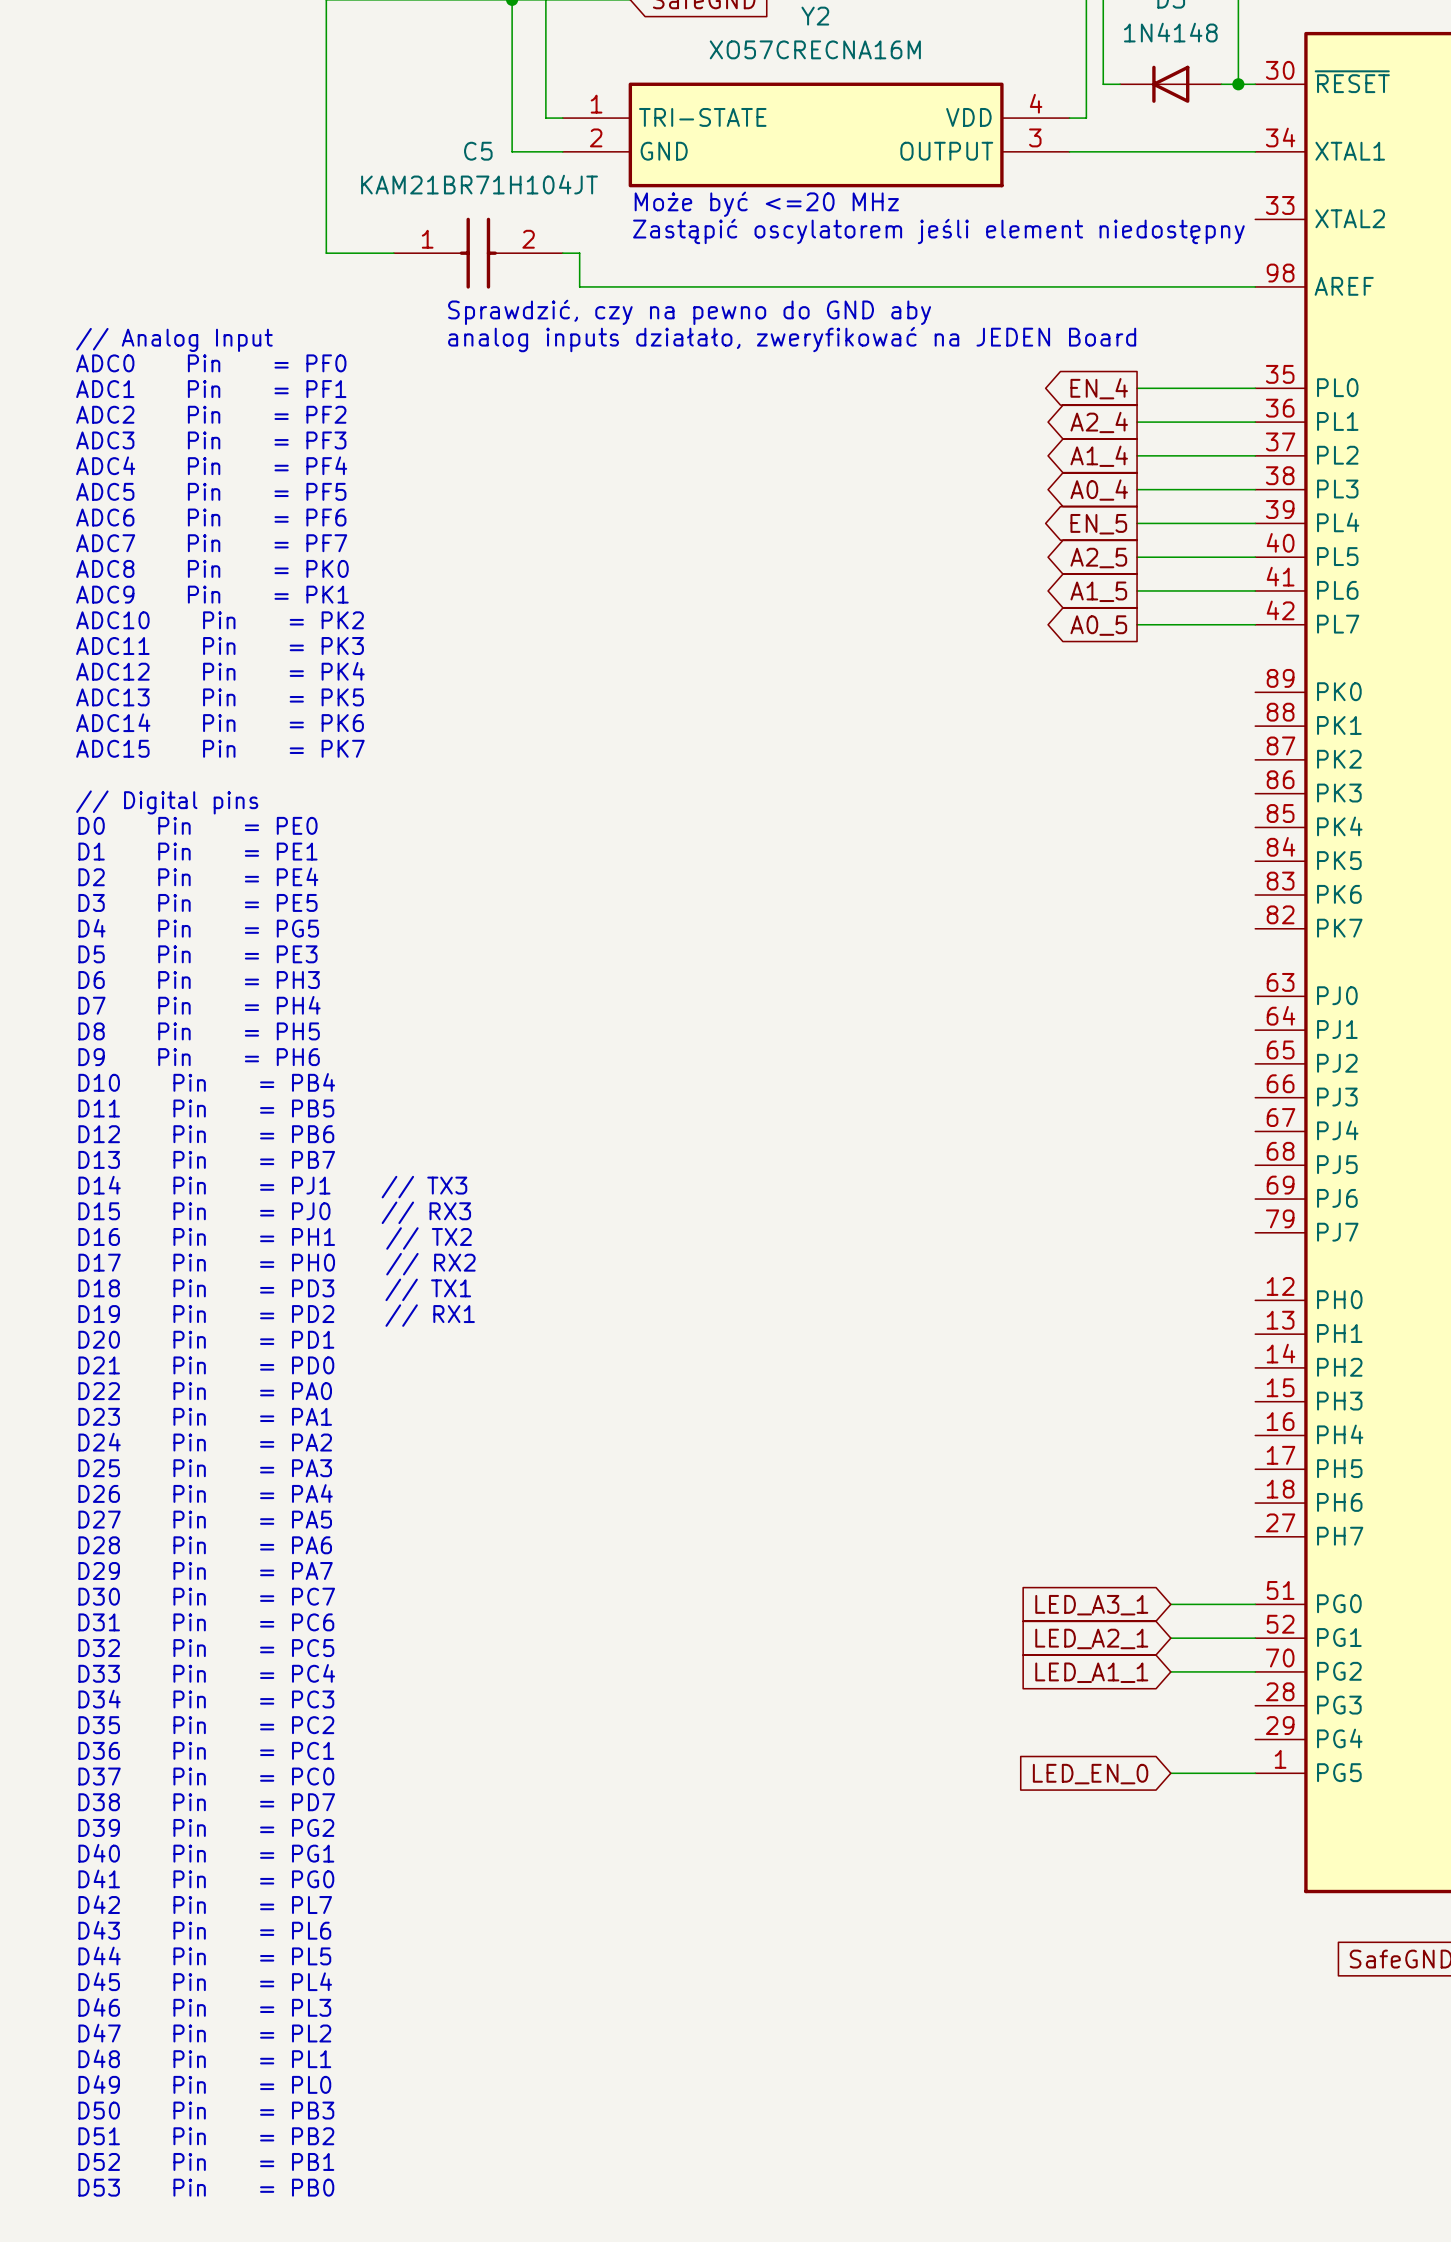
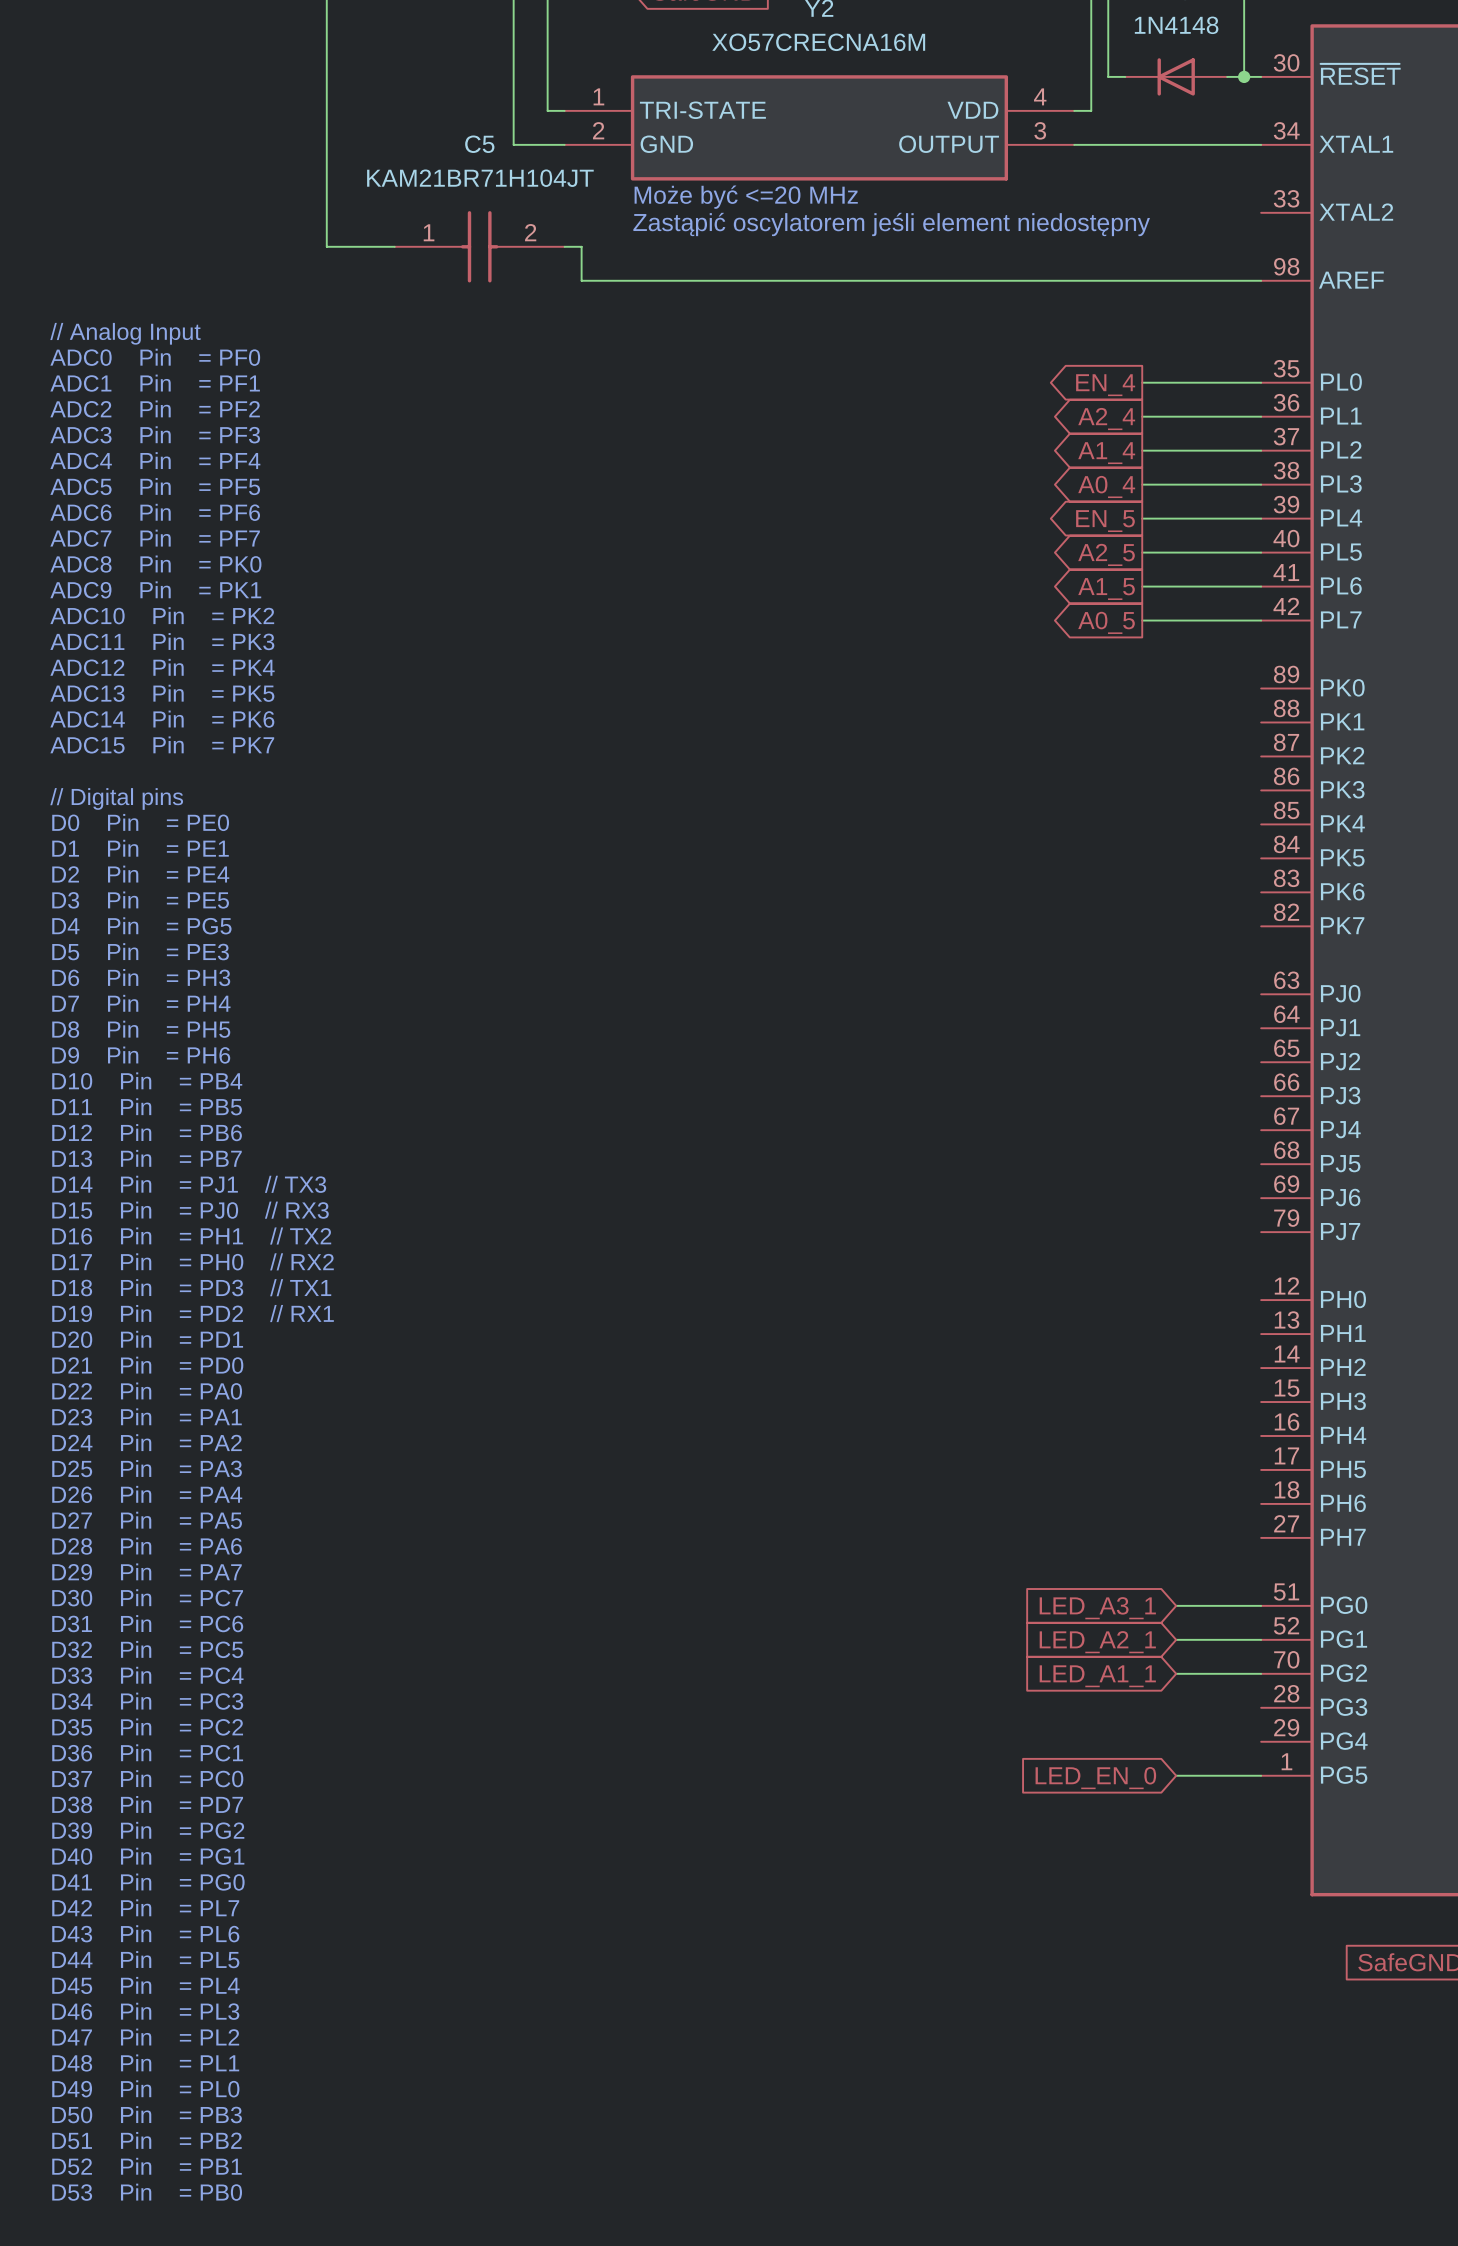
text: Sprawdzić, czy na pewno do GND aby (689, 312) -> none
text: analog inputs działało, zweryfikować na JEDEN Board (792, 339) -> none

